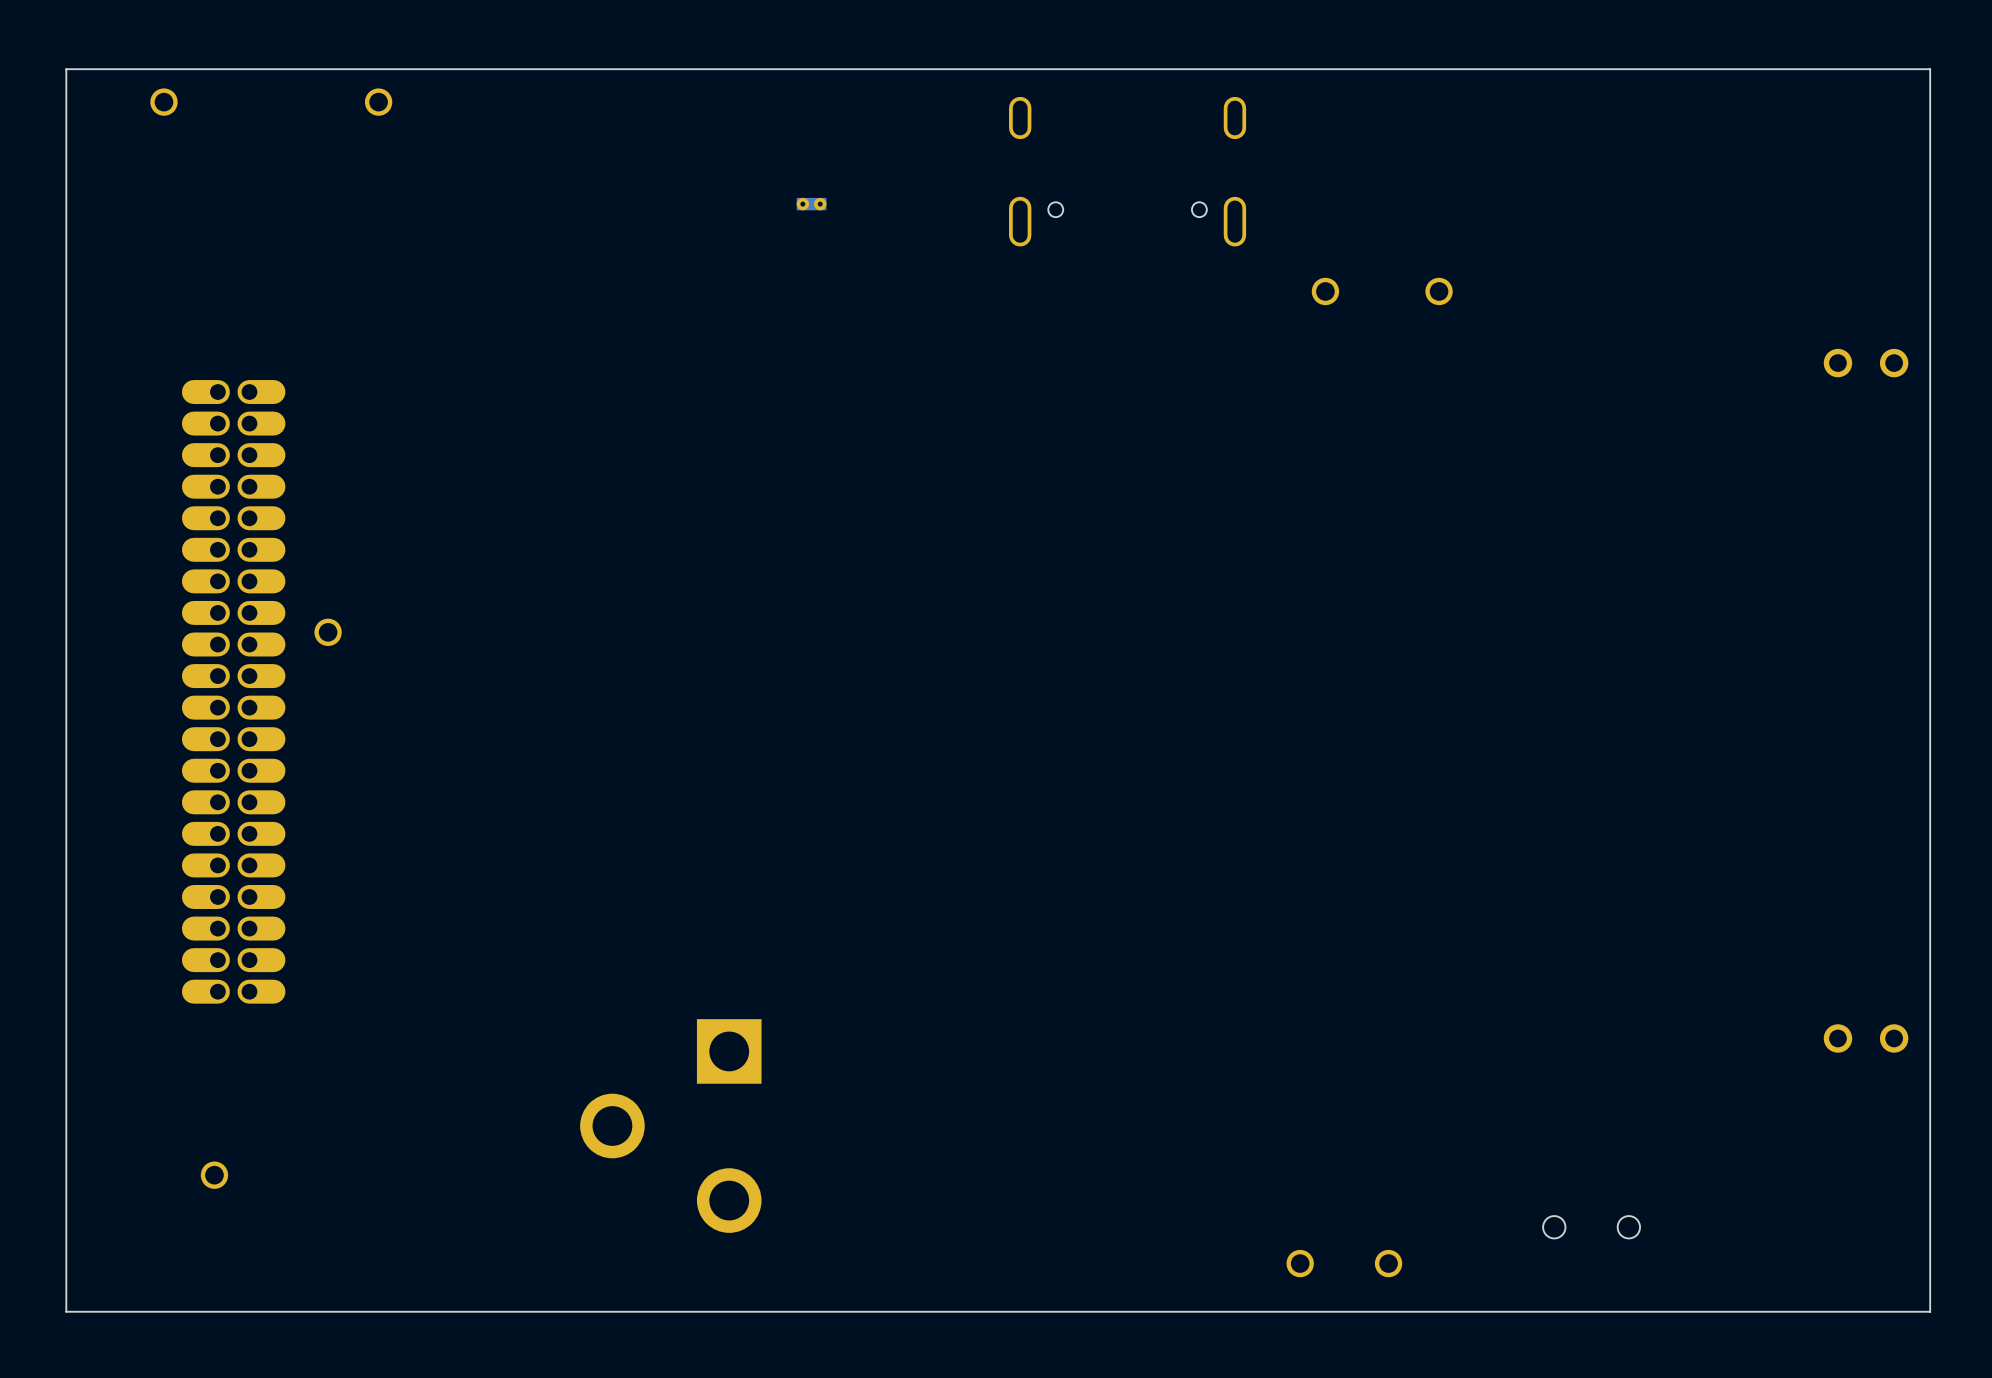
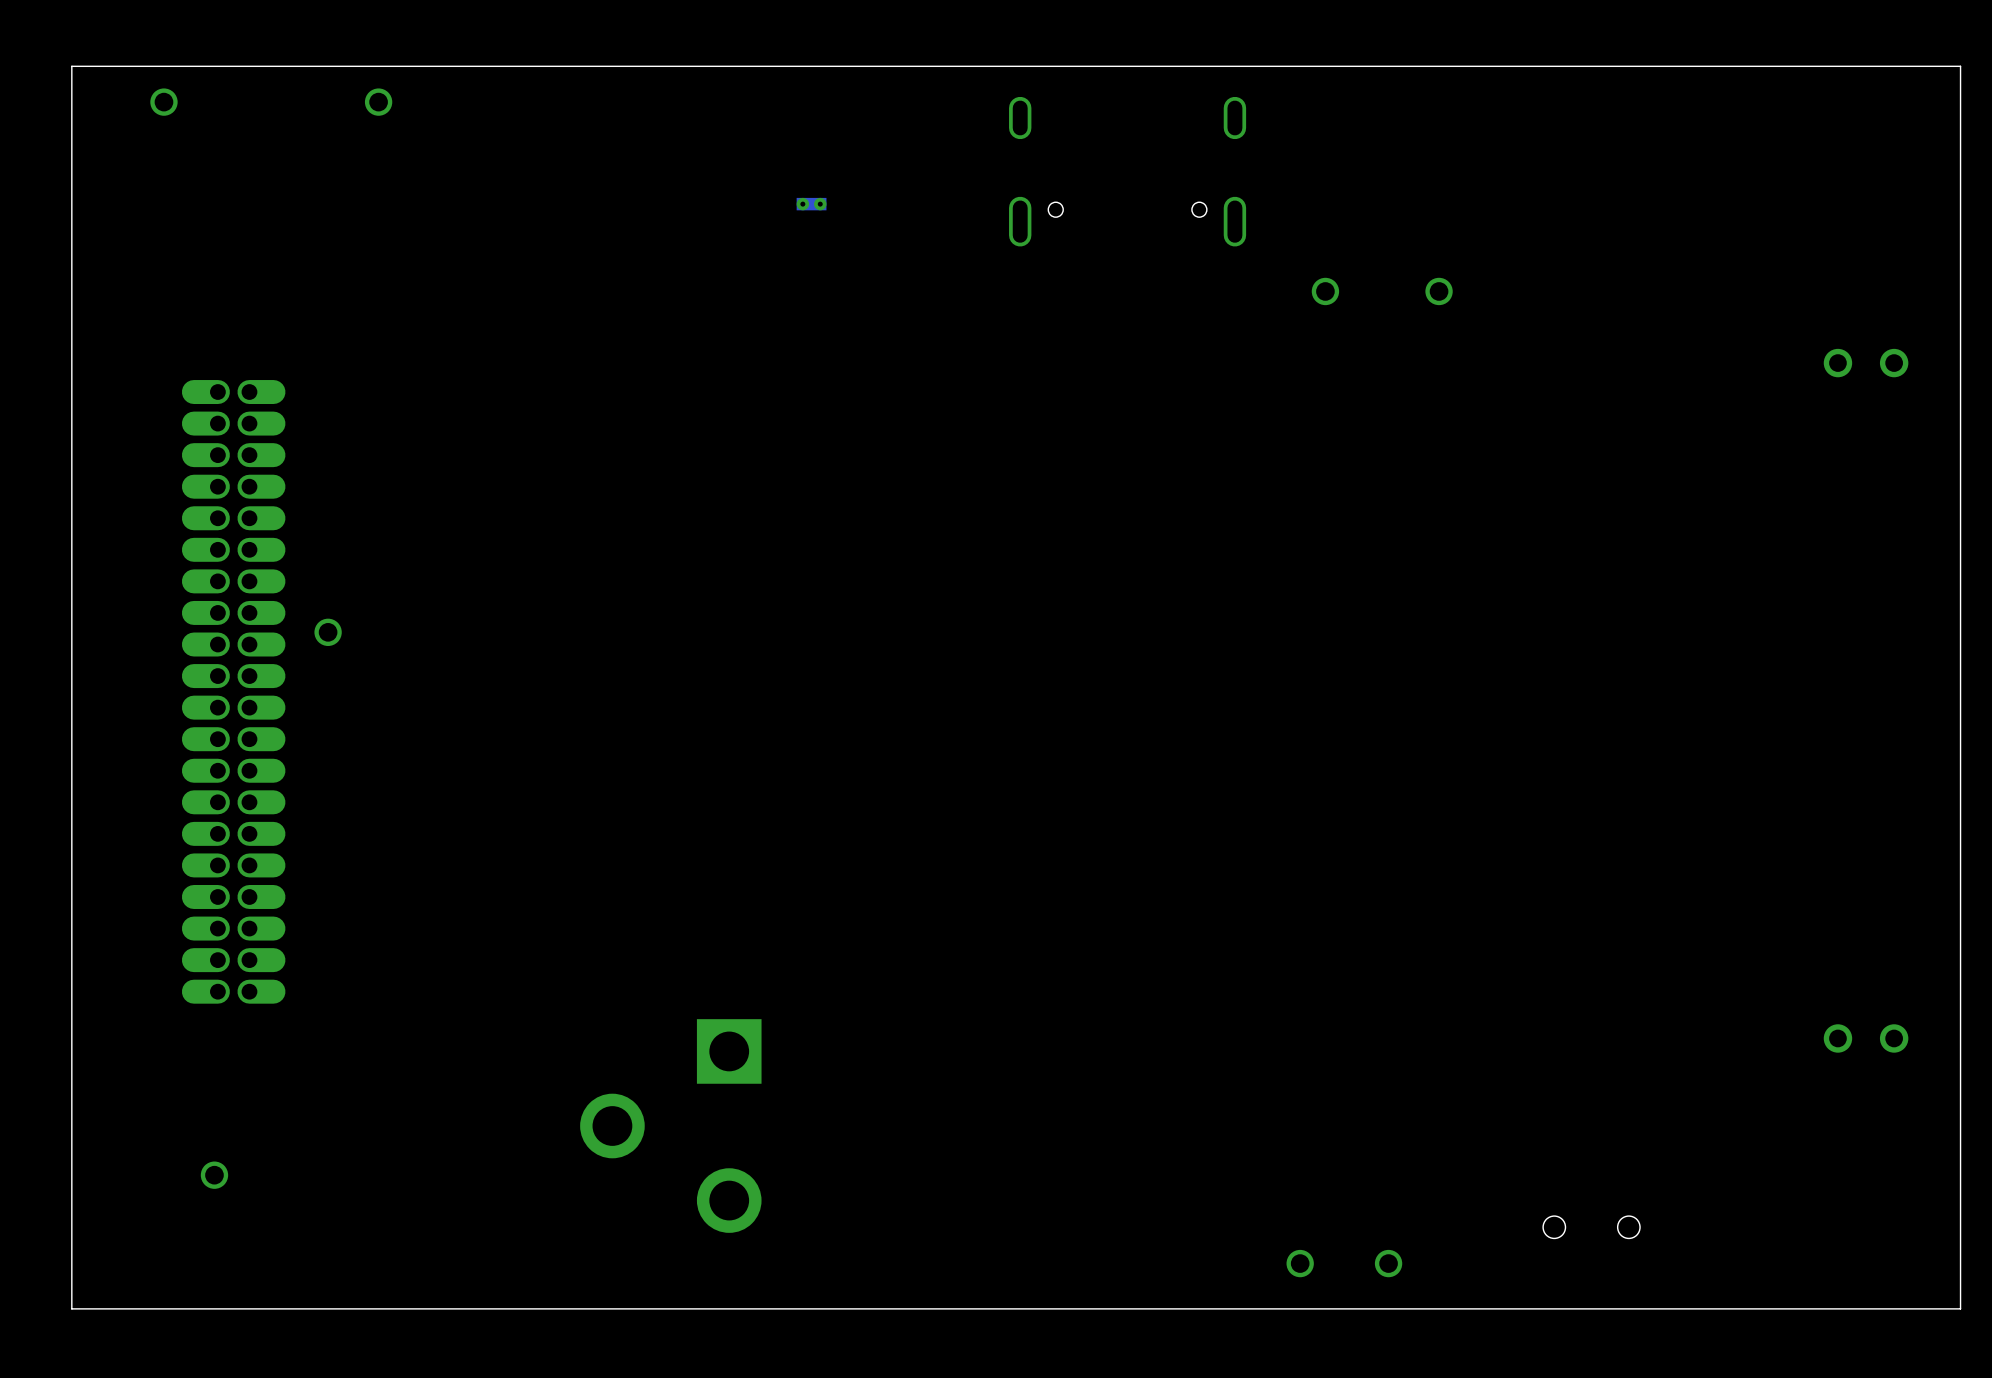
board edge: (1930, 69) (66, 69) (66, 1311) (1930, 1311) (1930, 69) -> (1960, 66) (1960, 1308) (71, 1308) (71, 66) (1960, 66)

